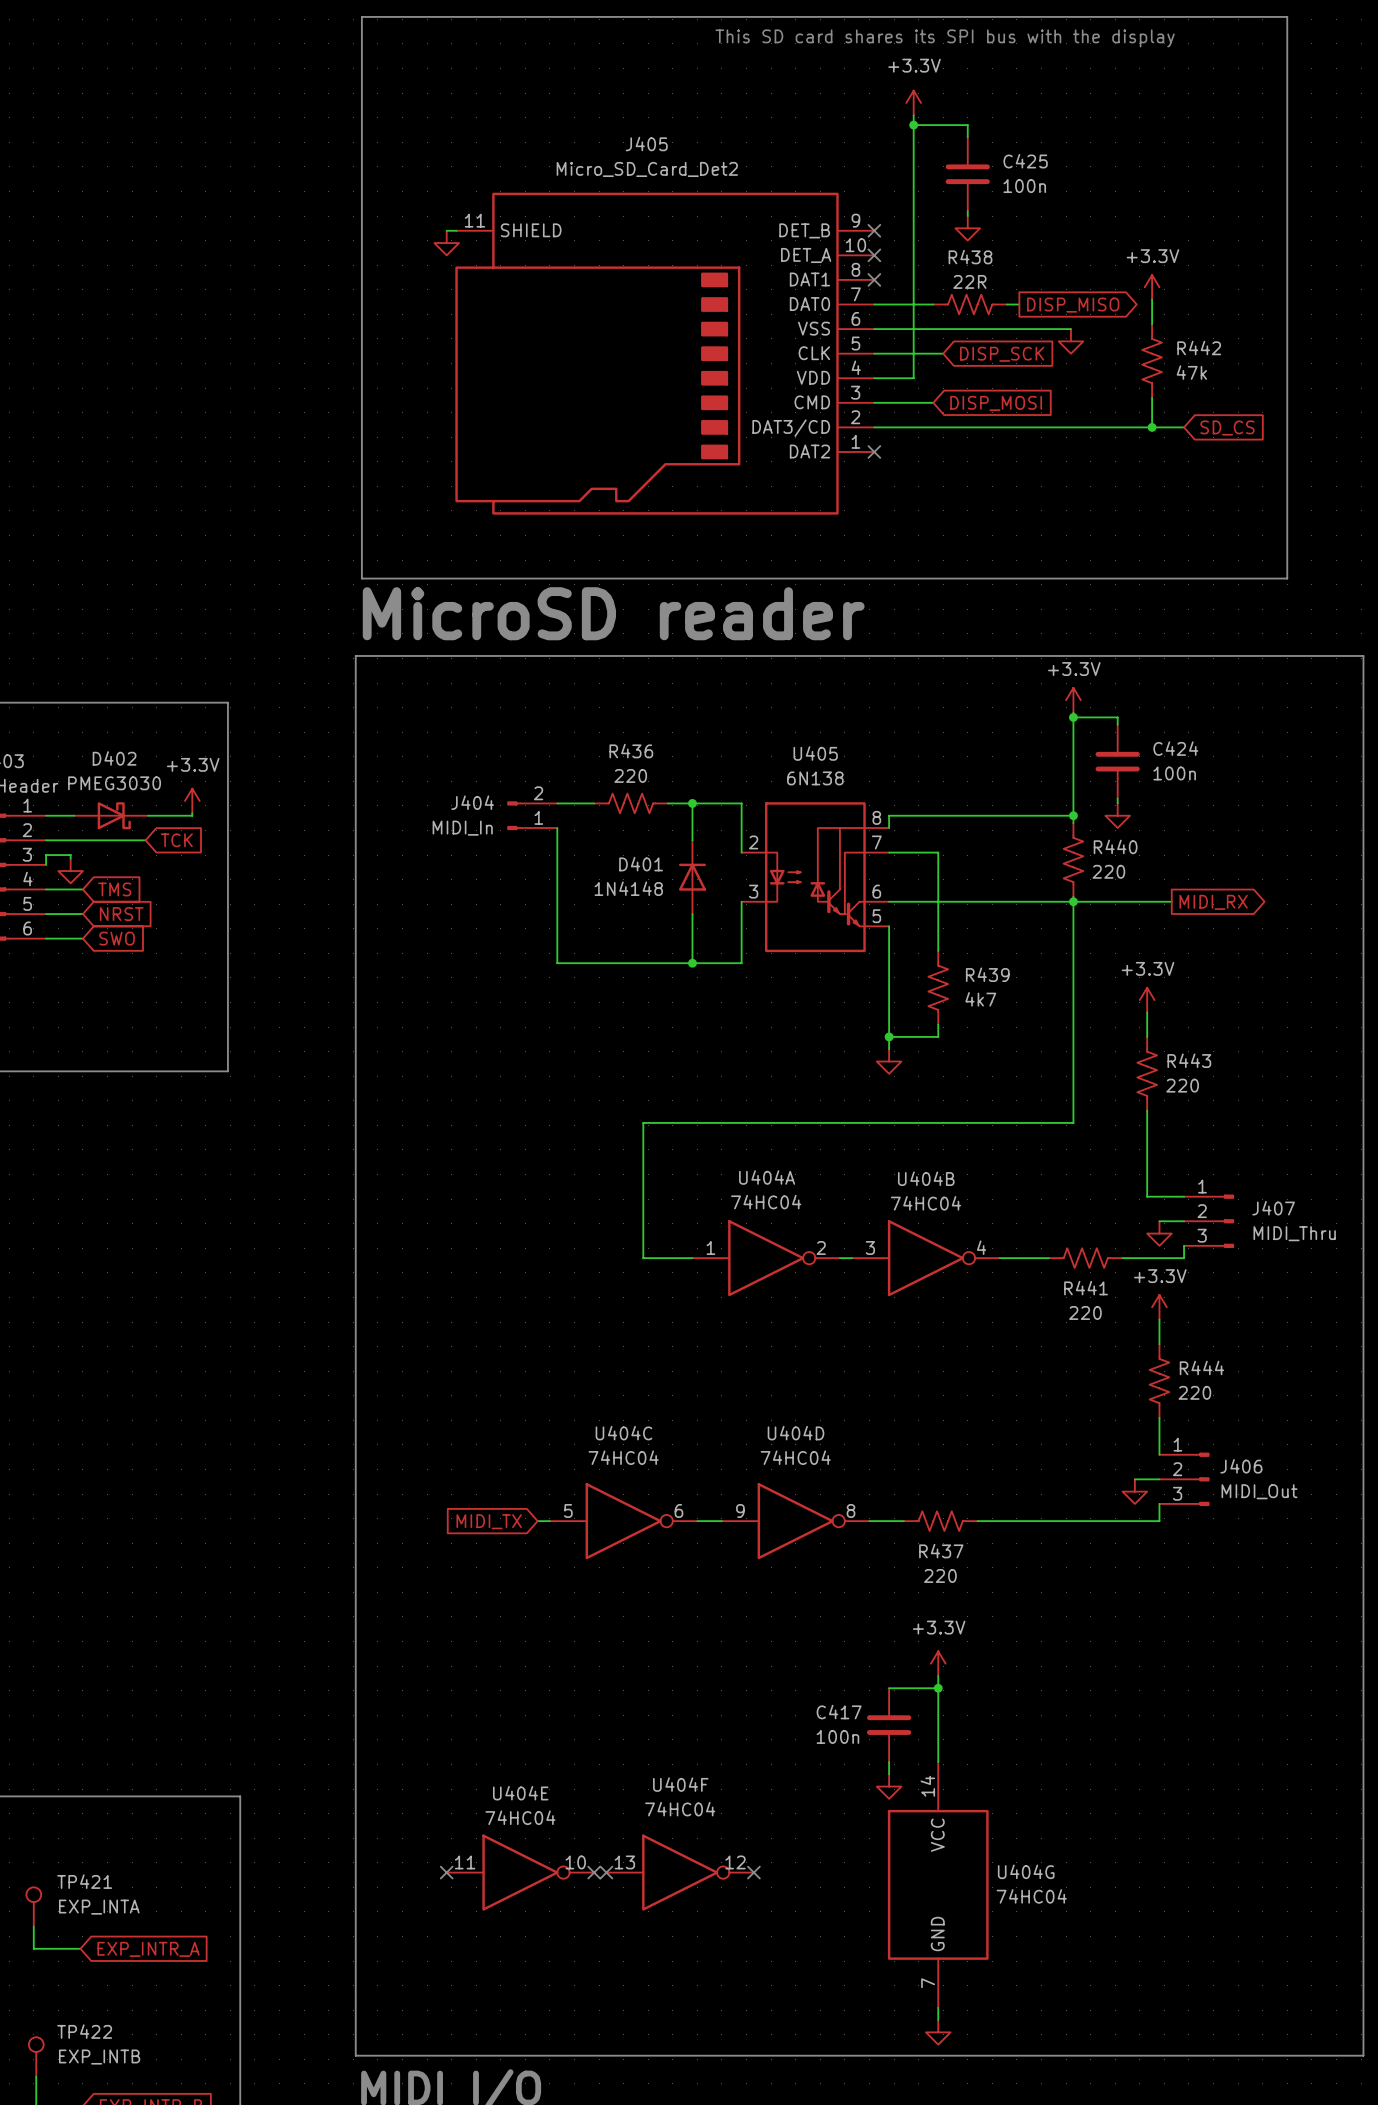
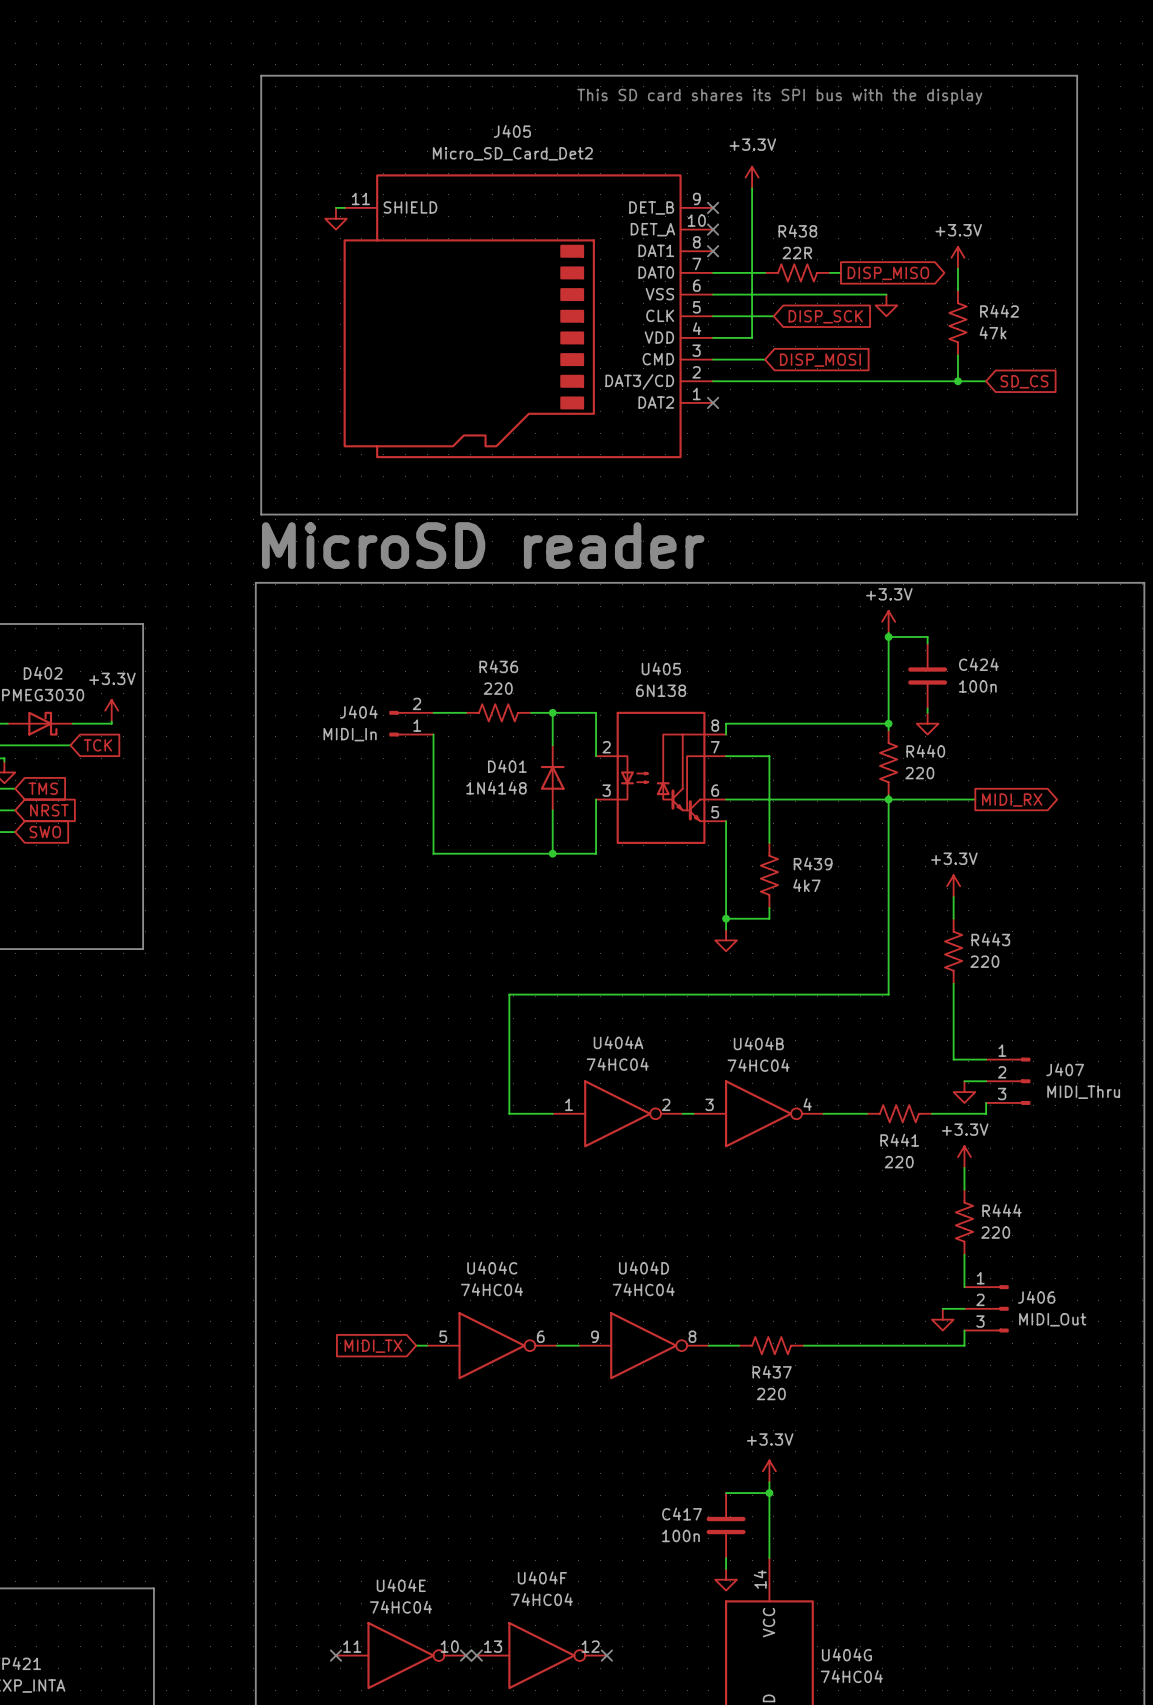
text position: This SD card shares its SPI bus with the display (945, 38) -> This SD card shares its SPI bus with the display (779, 96)
line: (361, 80) (361, 16) (1287, 16) (1287, 80) -> (261, 75) (1077, 75)
power symbol position: +3.3V (913, 102) -> +3.3V (752, 177)
wire: (913, 115) (913, 378) -> (752, 188) (752, 337) (747, 337)
wire: (913, 125) (967, 125) (967, 137) -> none
junction: (913, 125) -> none
C425: 100n (967, 174) -> none
wire: (967, 211) (967, 216) -> none
power symbol: (967, 228) -> none

